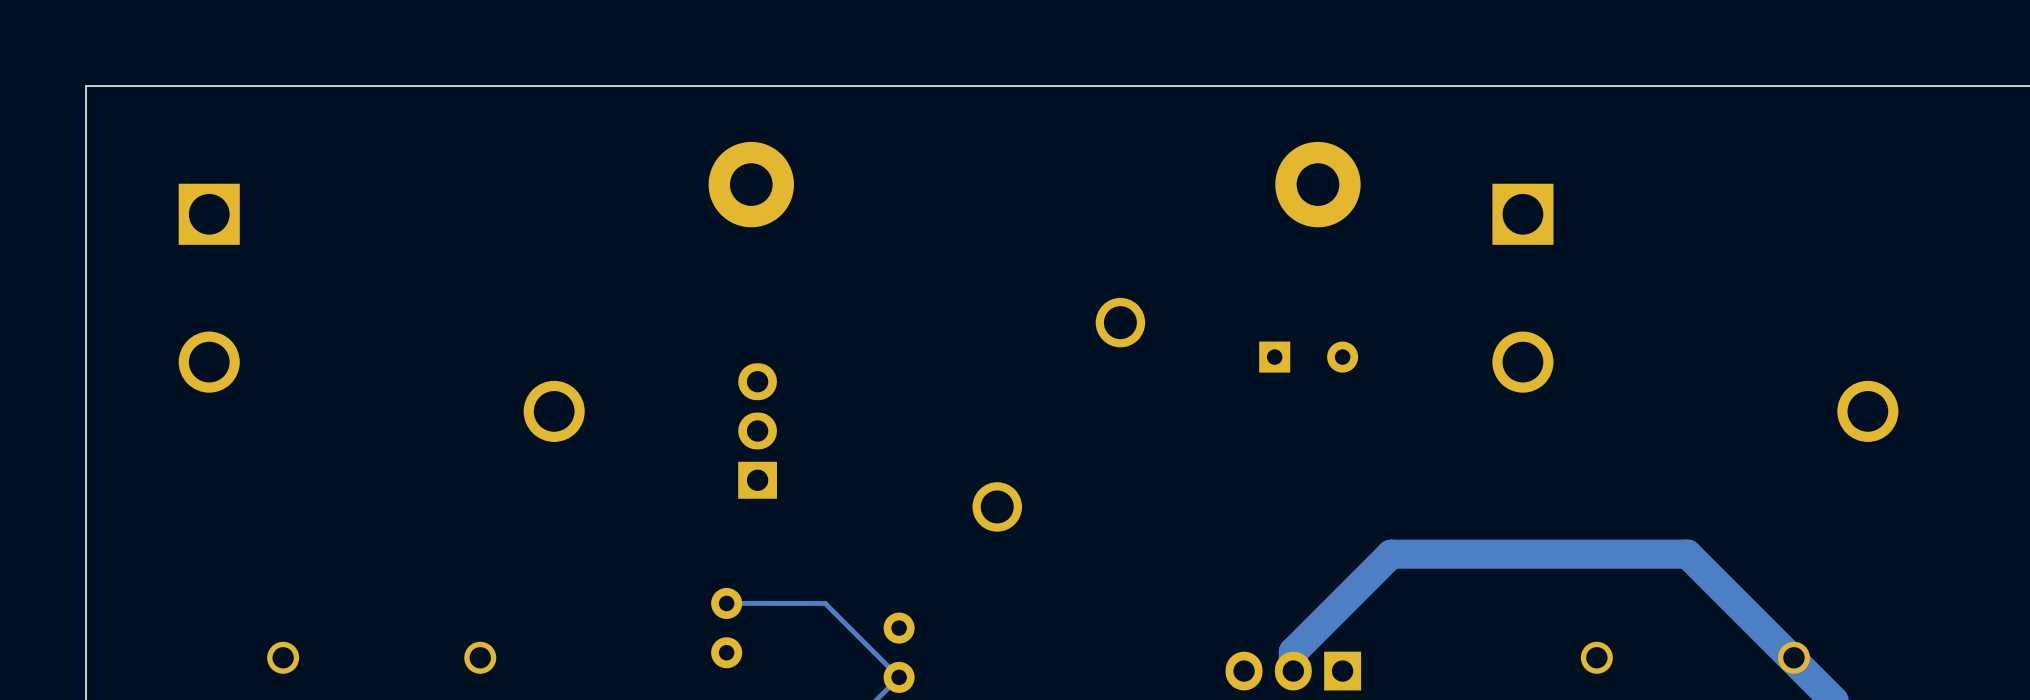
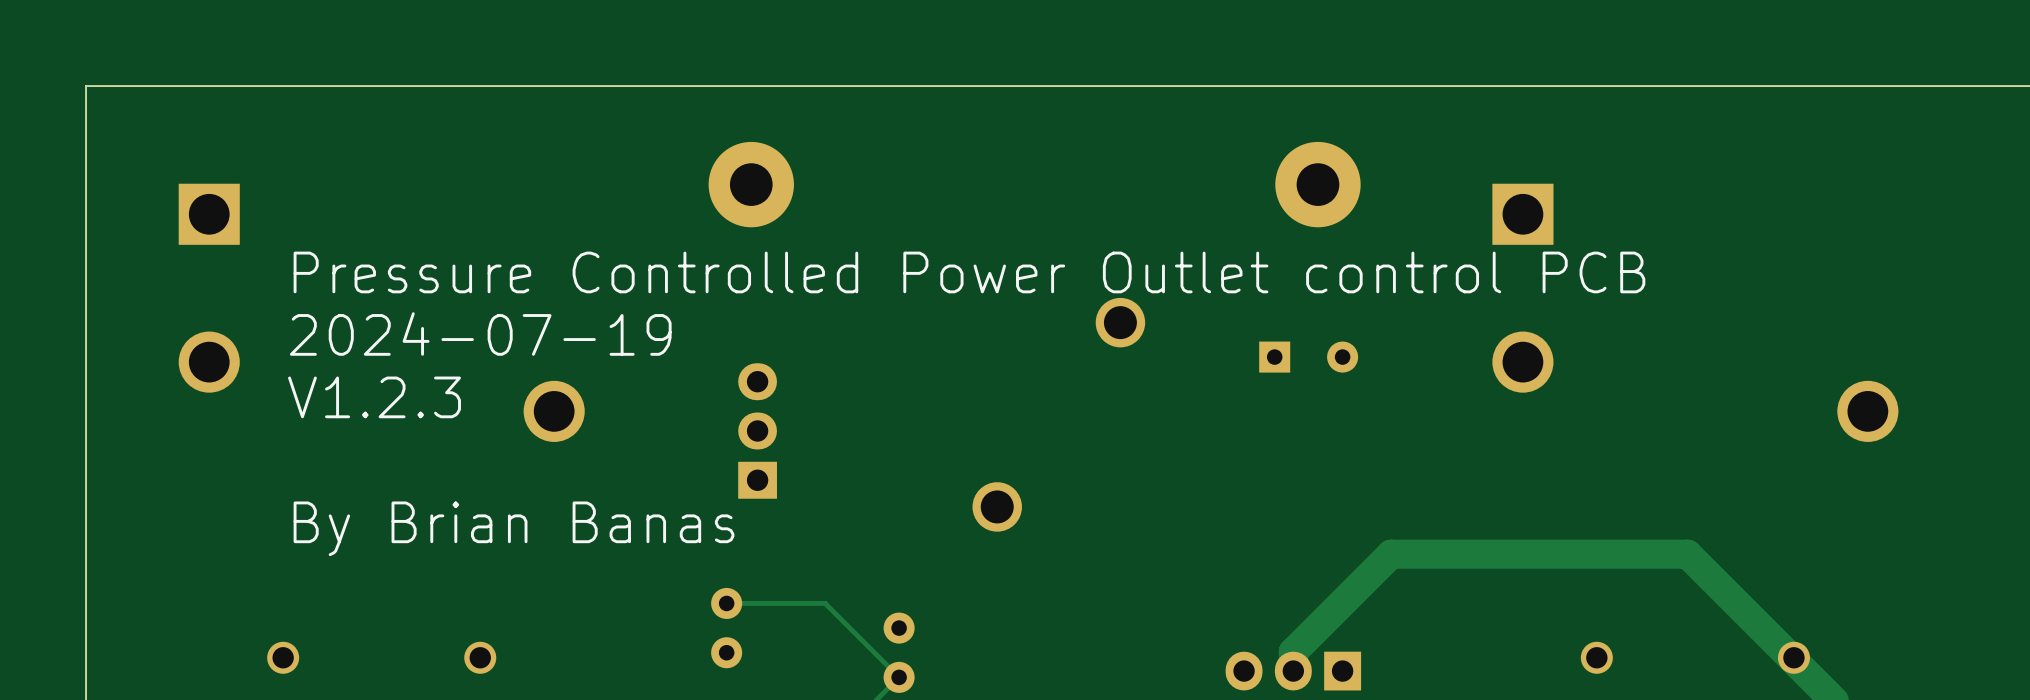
text: none -> Pressure Controlled Power Outlet control PCB (969, 272)
text: none -> 2024-07-19 (480, 333)
text: none -> V1.2.3 (374, 397)
text: none -> By Brian Banas (514, 528)

